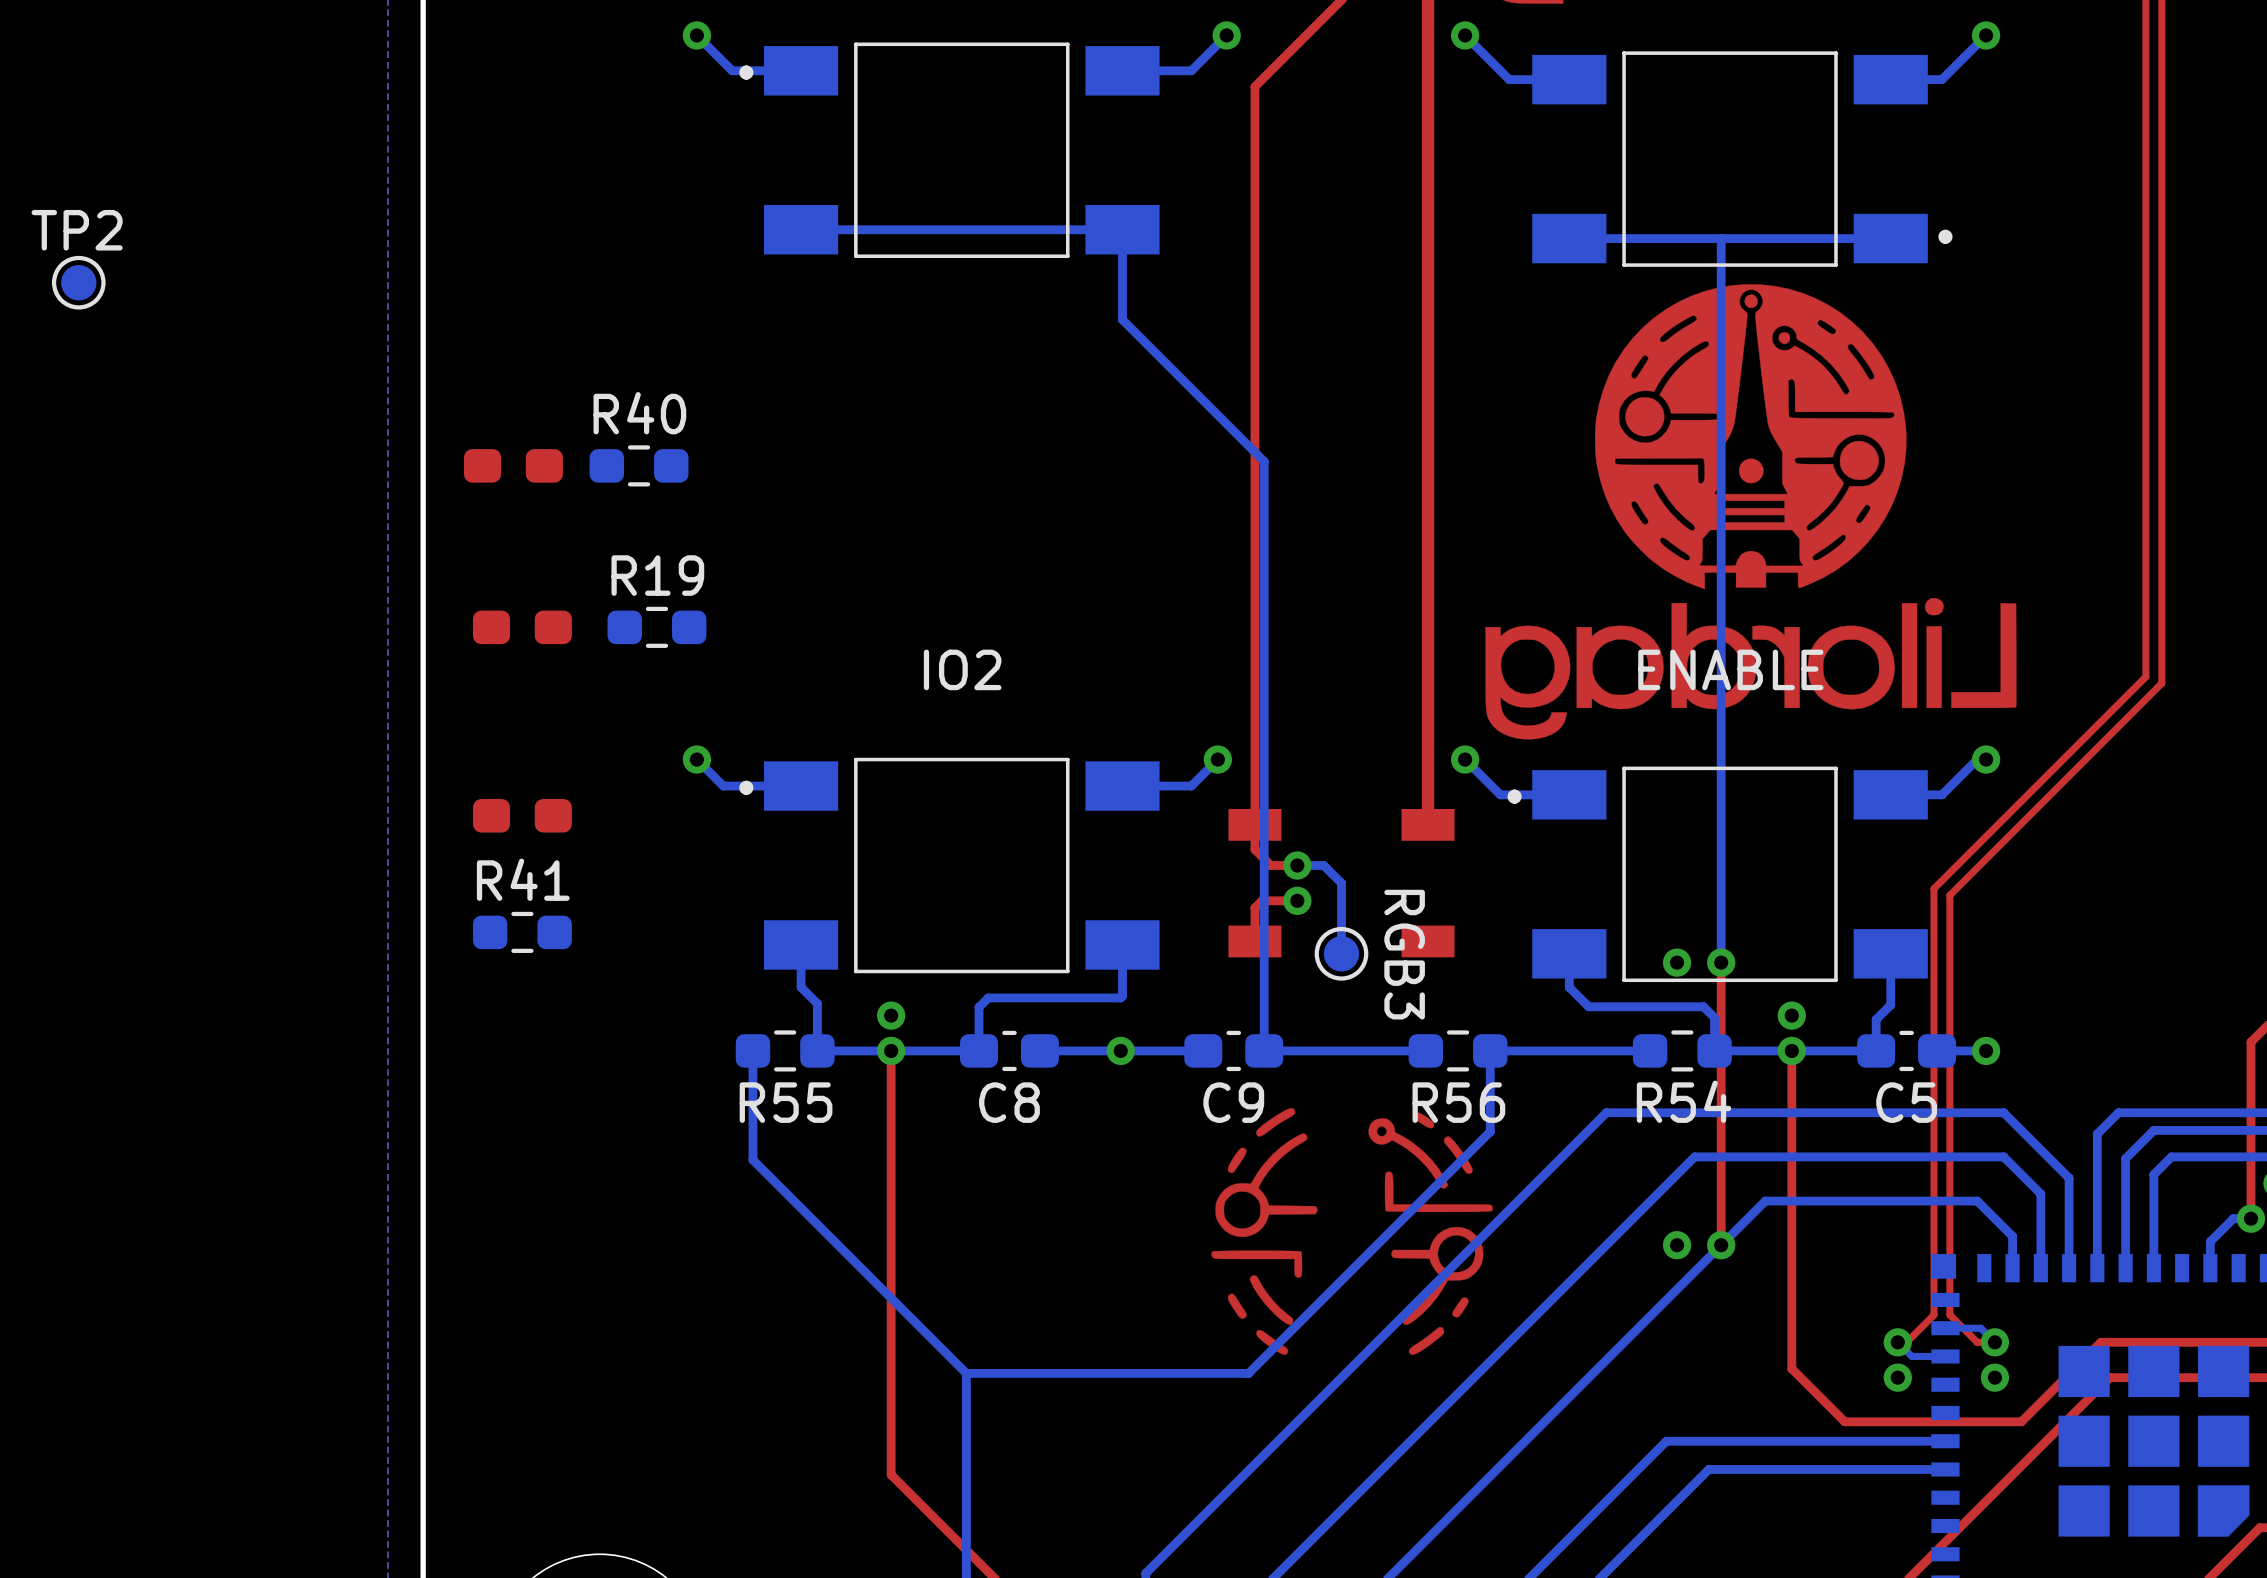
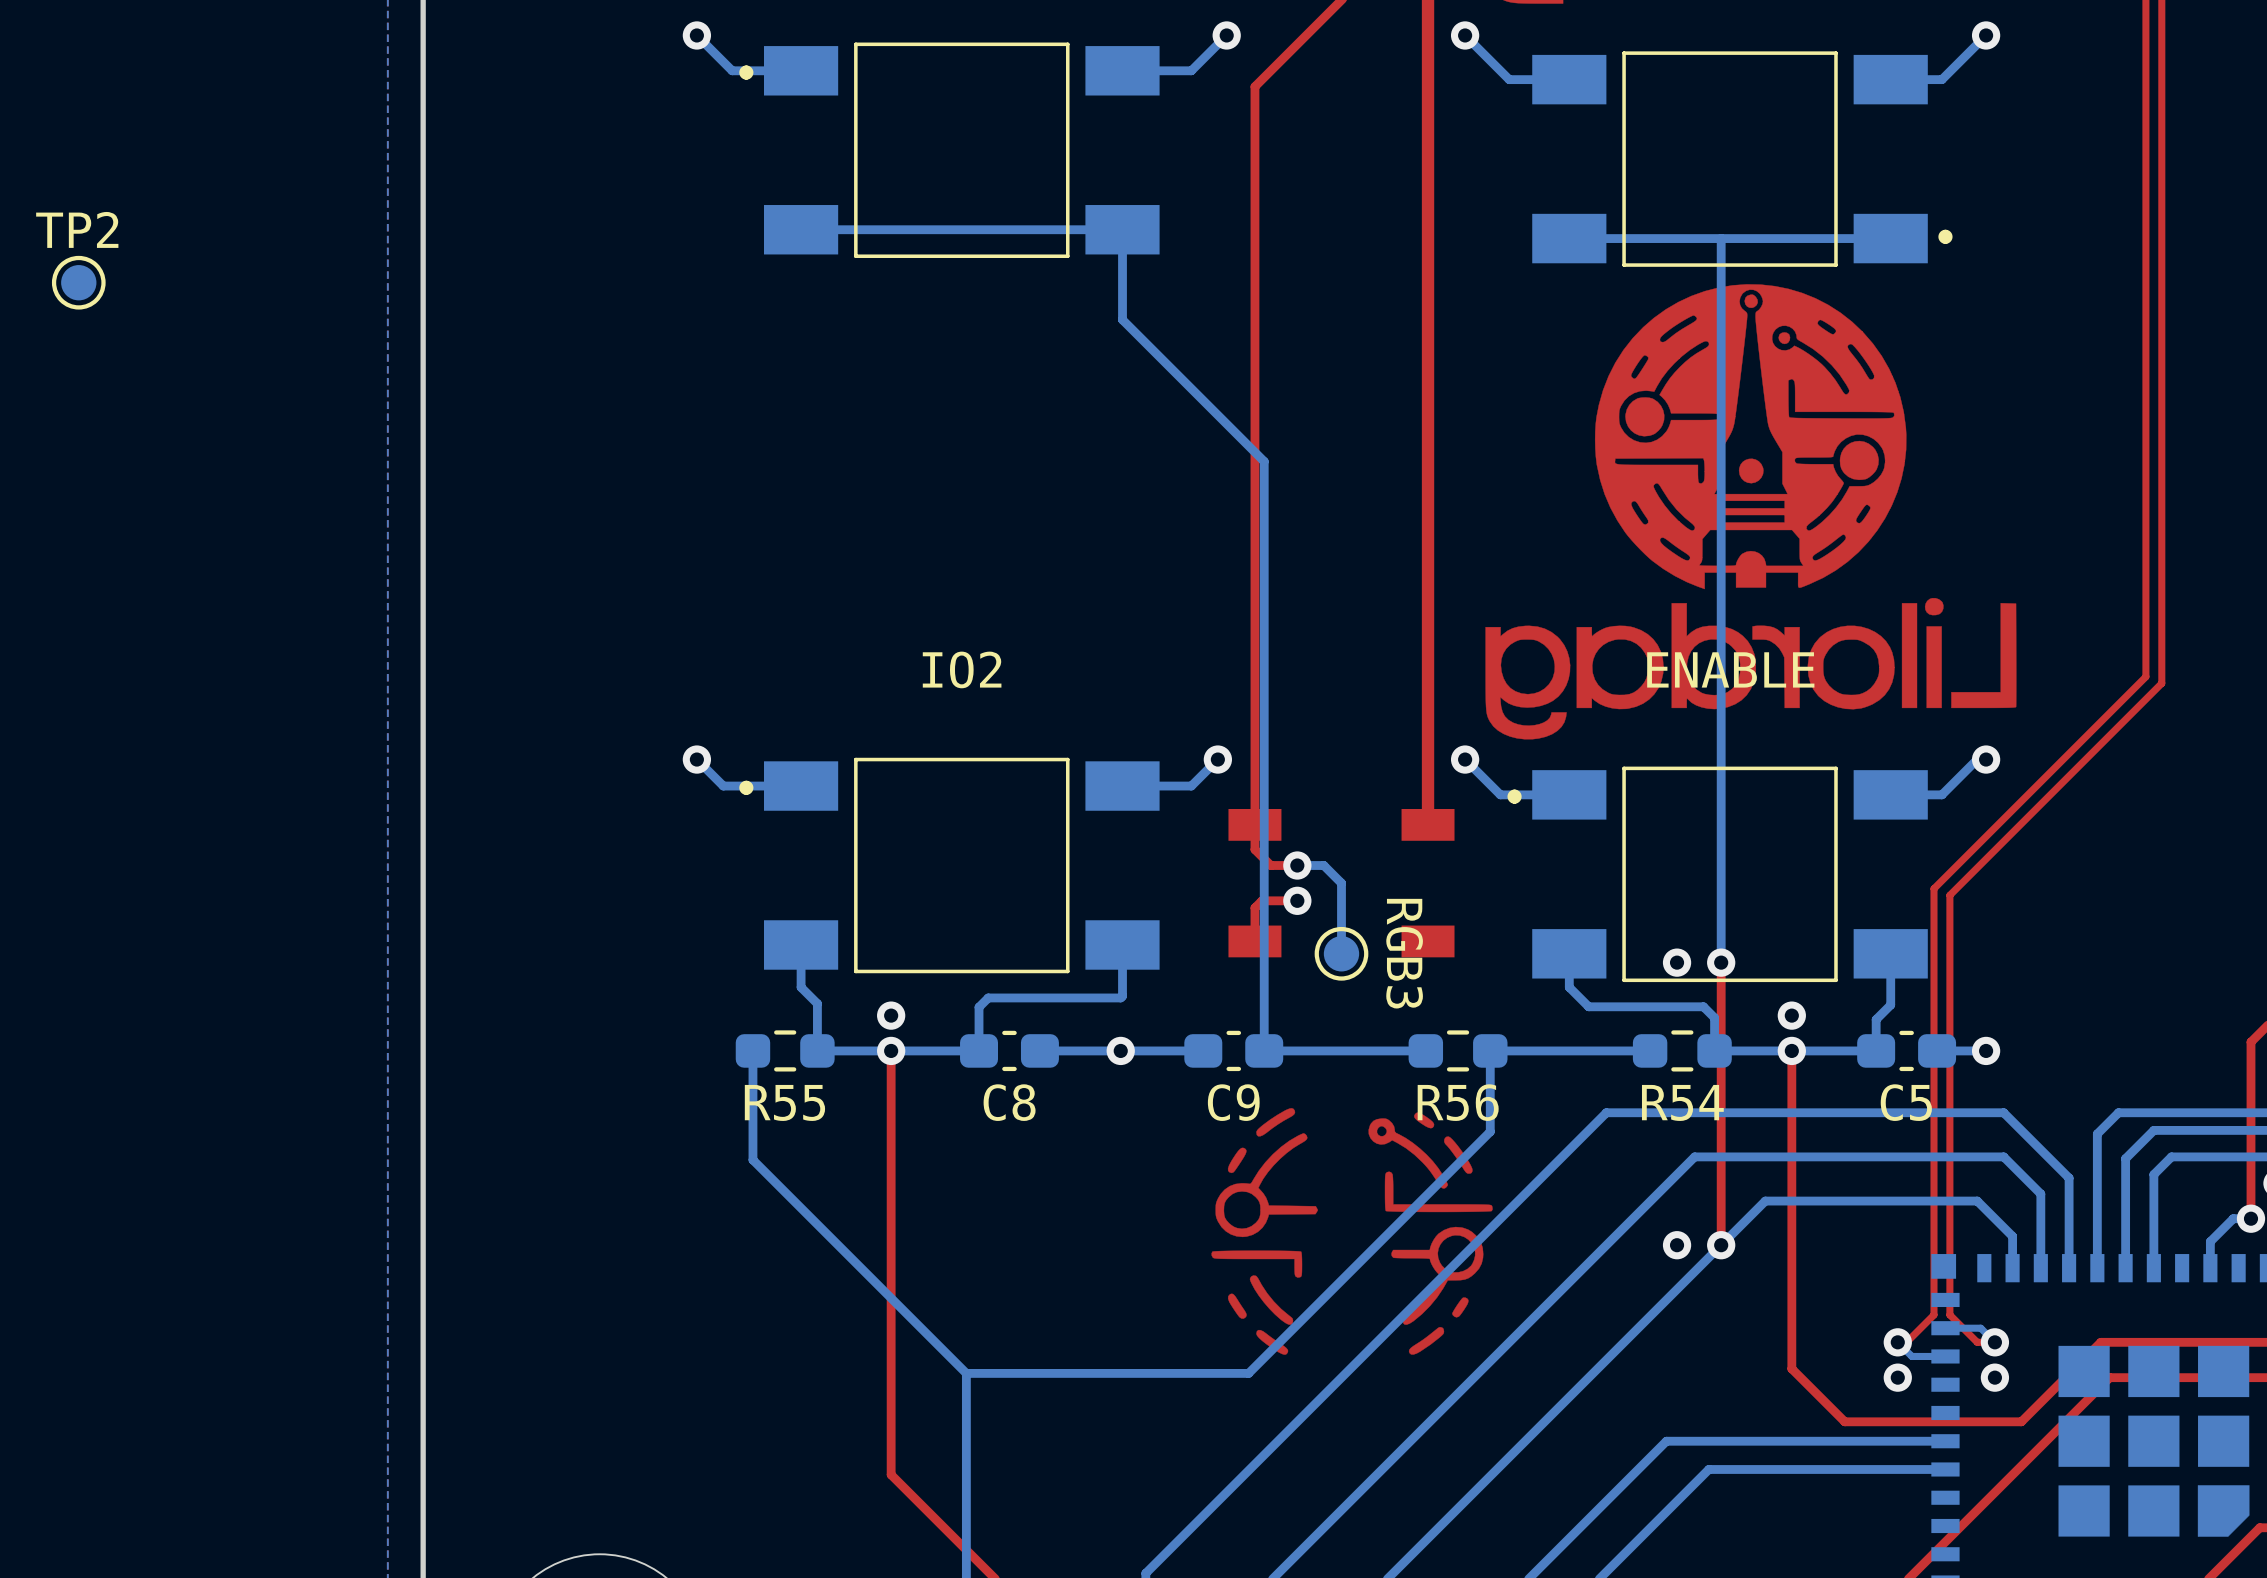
part: (513, 465) -> none
R40: (639, 465) -> none
part: (522, 627) -> none
R19: (656, 627) -> none
part: (522, 815) -> none
R41: (522, 932) -> none

